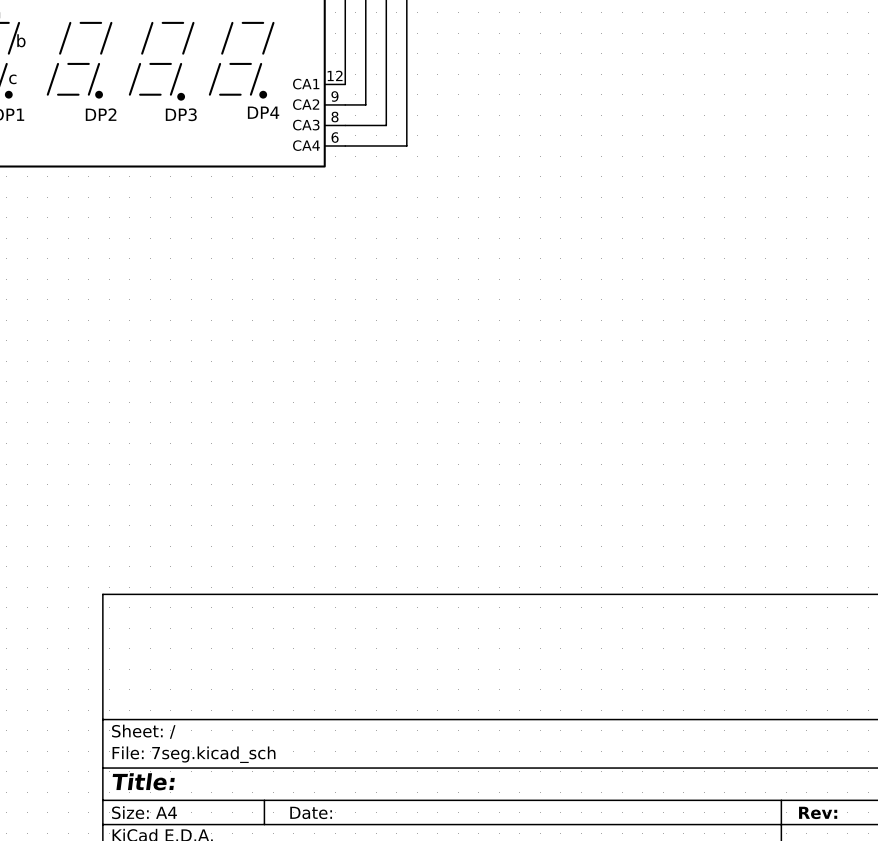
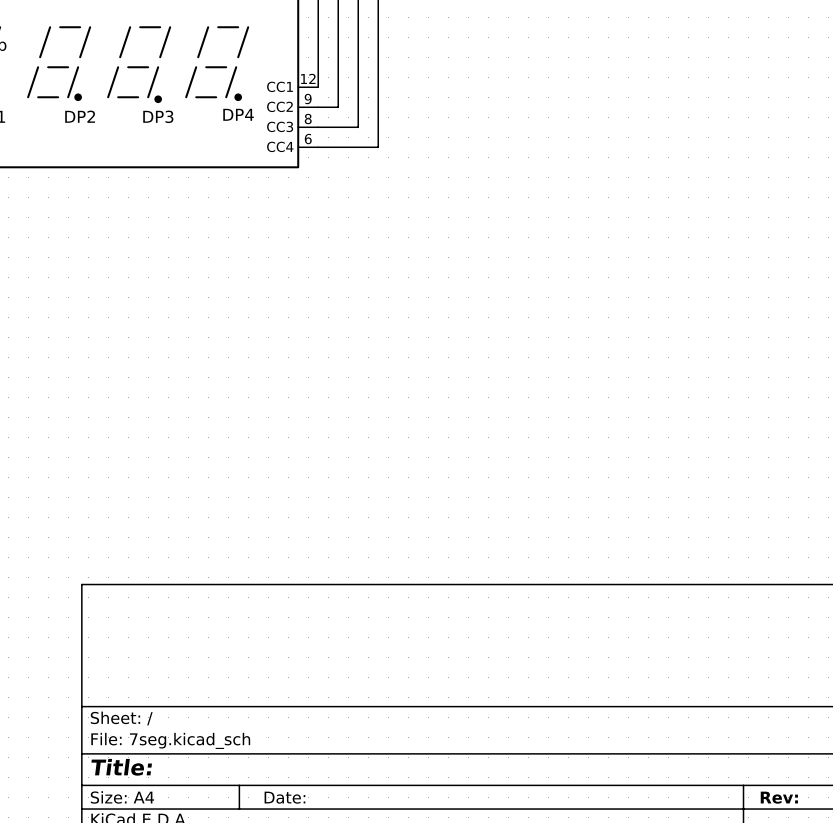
part pin name: CA1 (306, 84) -> CC1 (280, 86)
part pin name: CA2 (306, 104) -> CC2 (279, 106)
part pin name: CA3 (306, 125) -> CC3 (280, 126)
part pin name: CA4 (306, 145) -> CC4 (280, 146)

